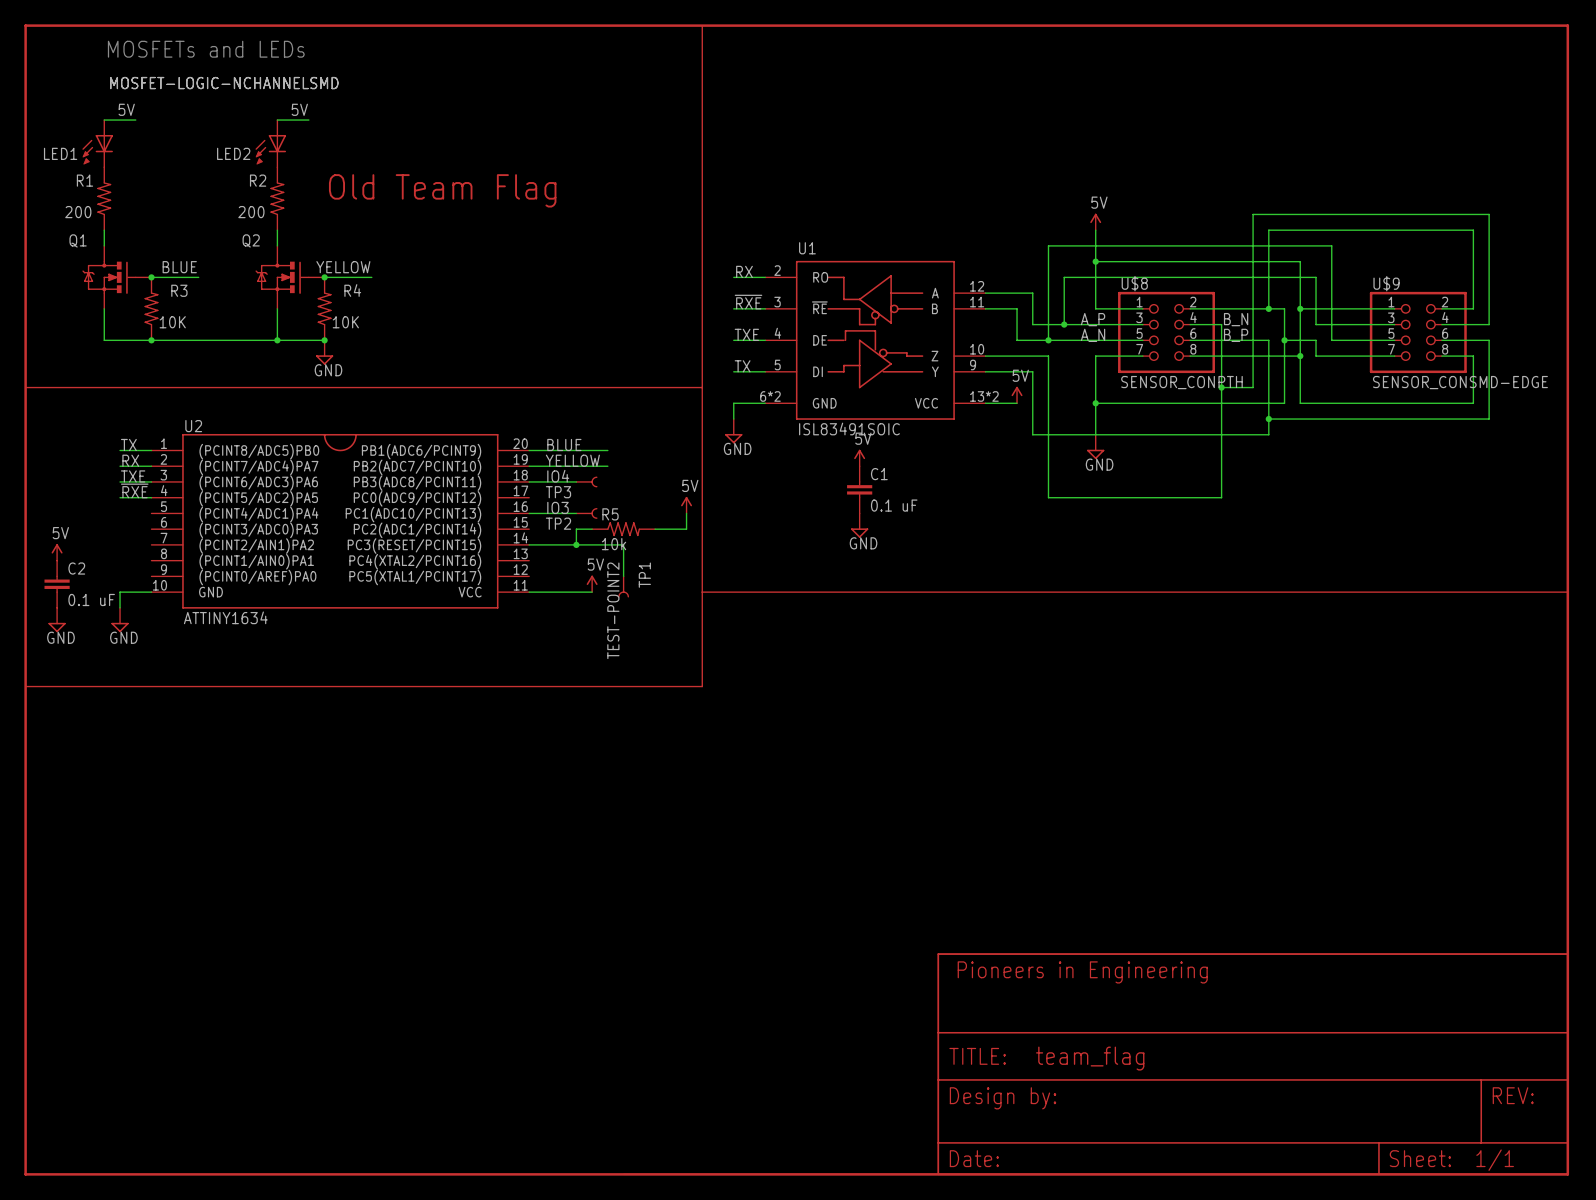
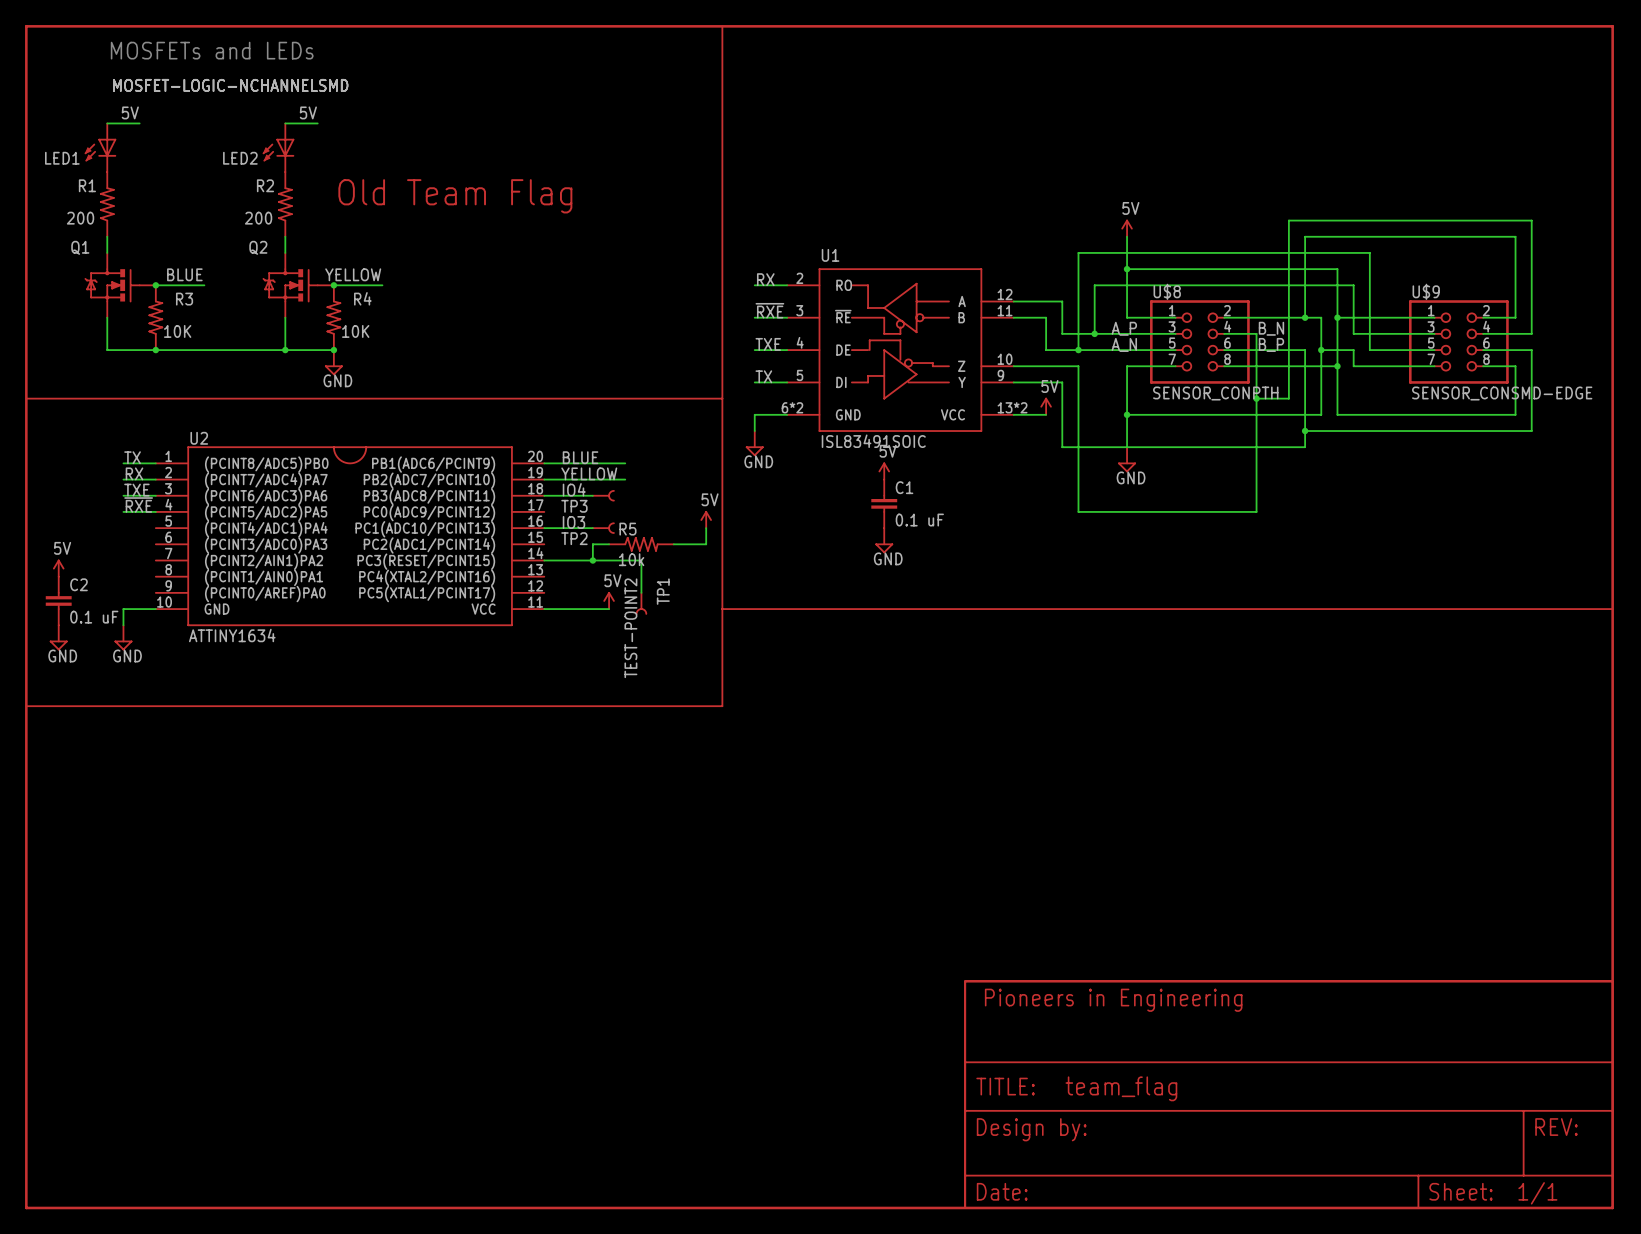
LED1 symbol: [82, 120, 113, 168] -> [84, 123, 117, 173]
LED2 symbol: [255, 120, 287, 168] -> [262, 123, 295, 173]

